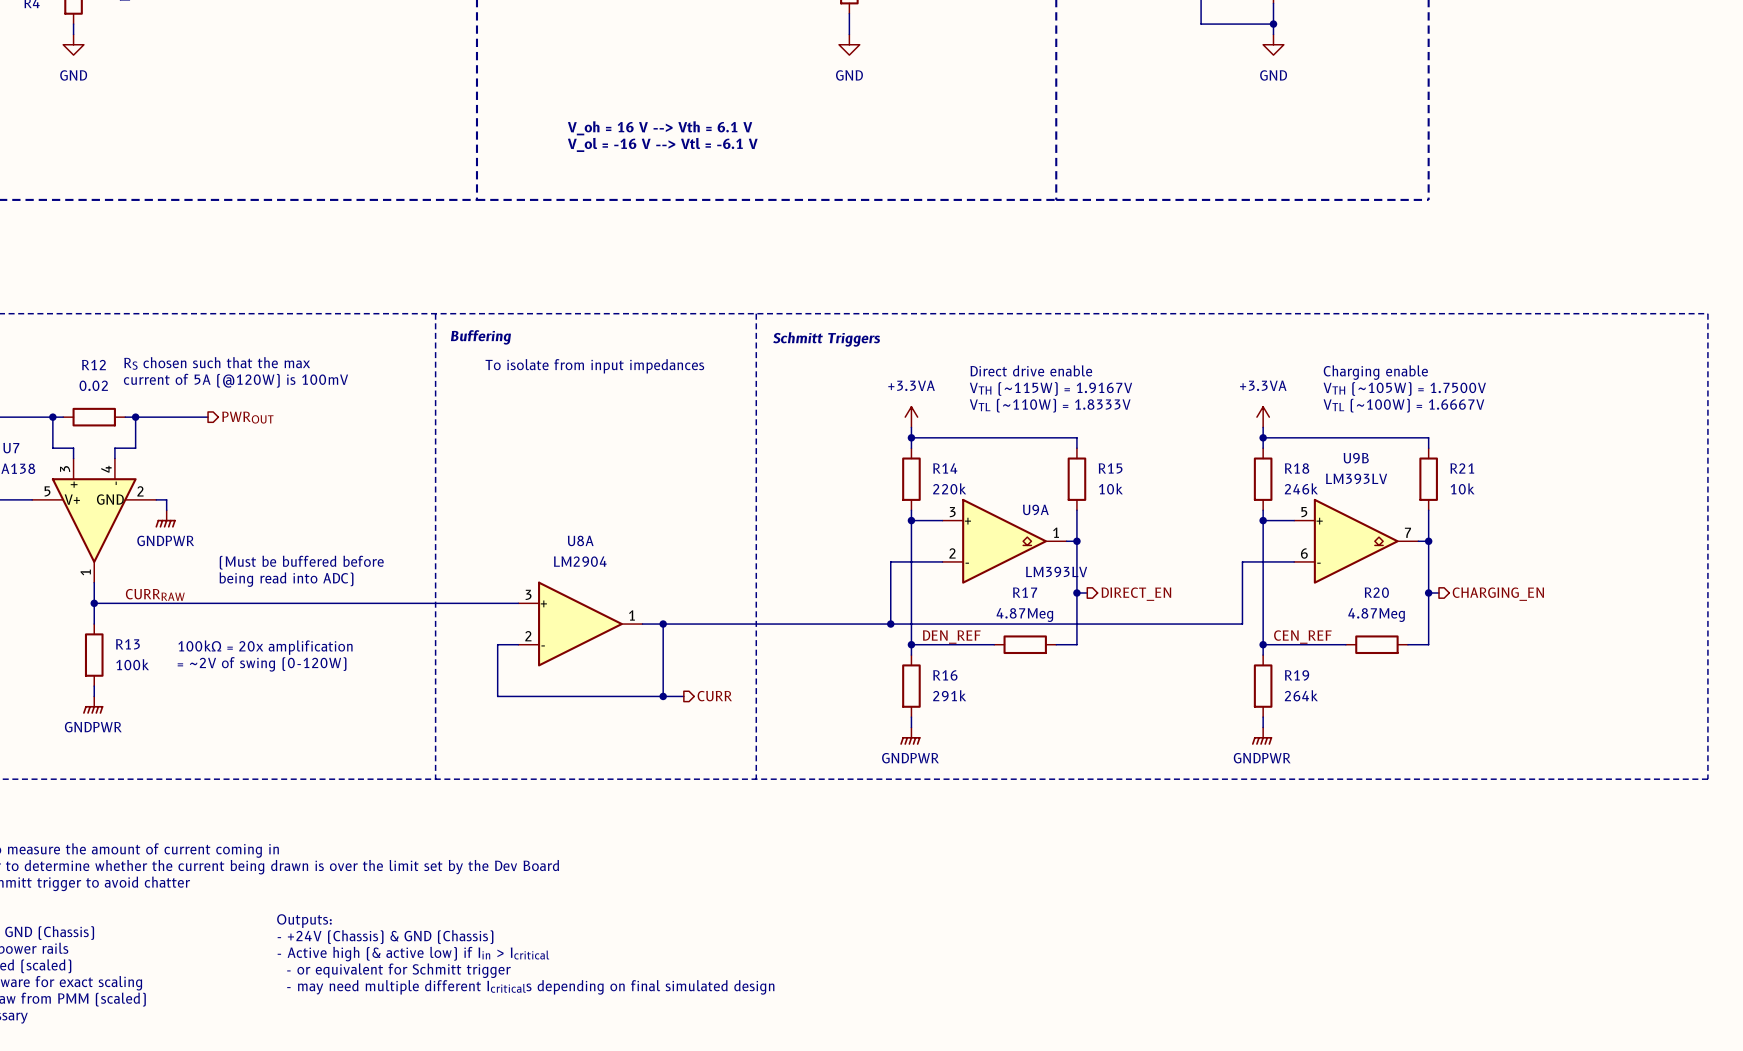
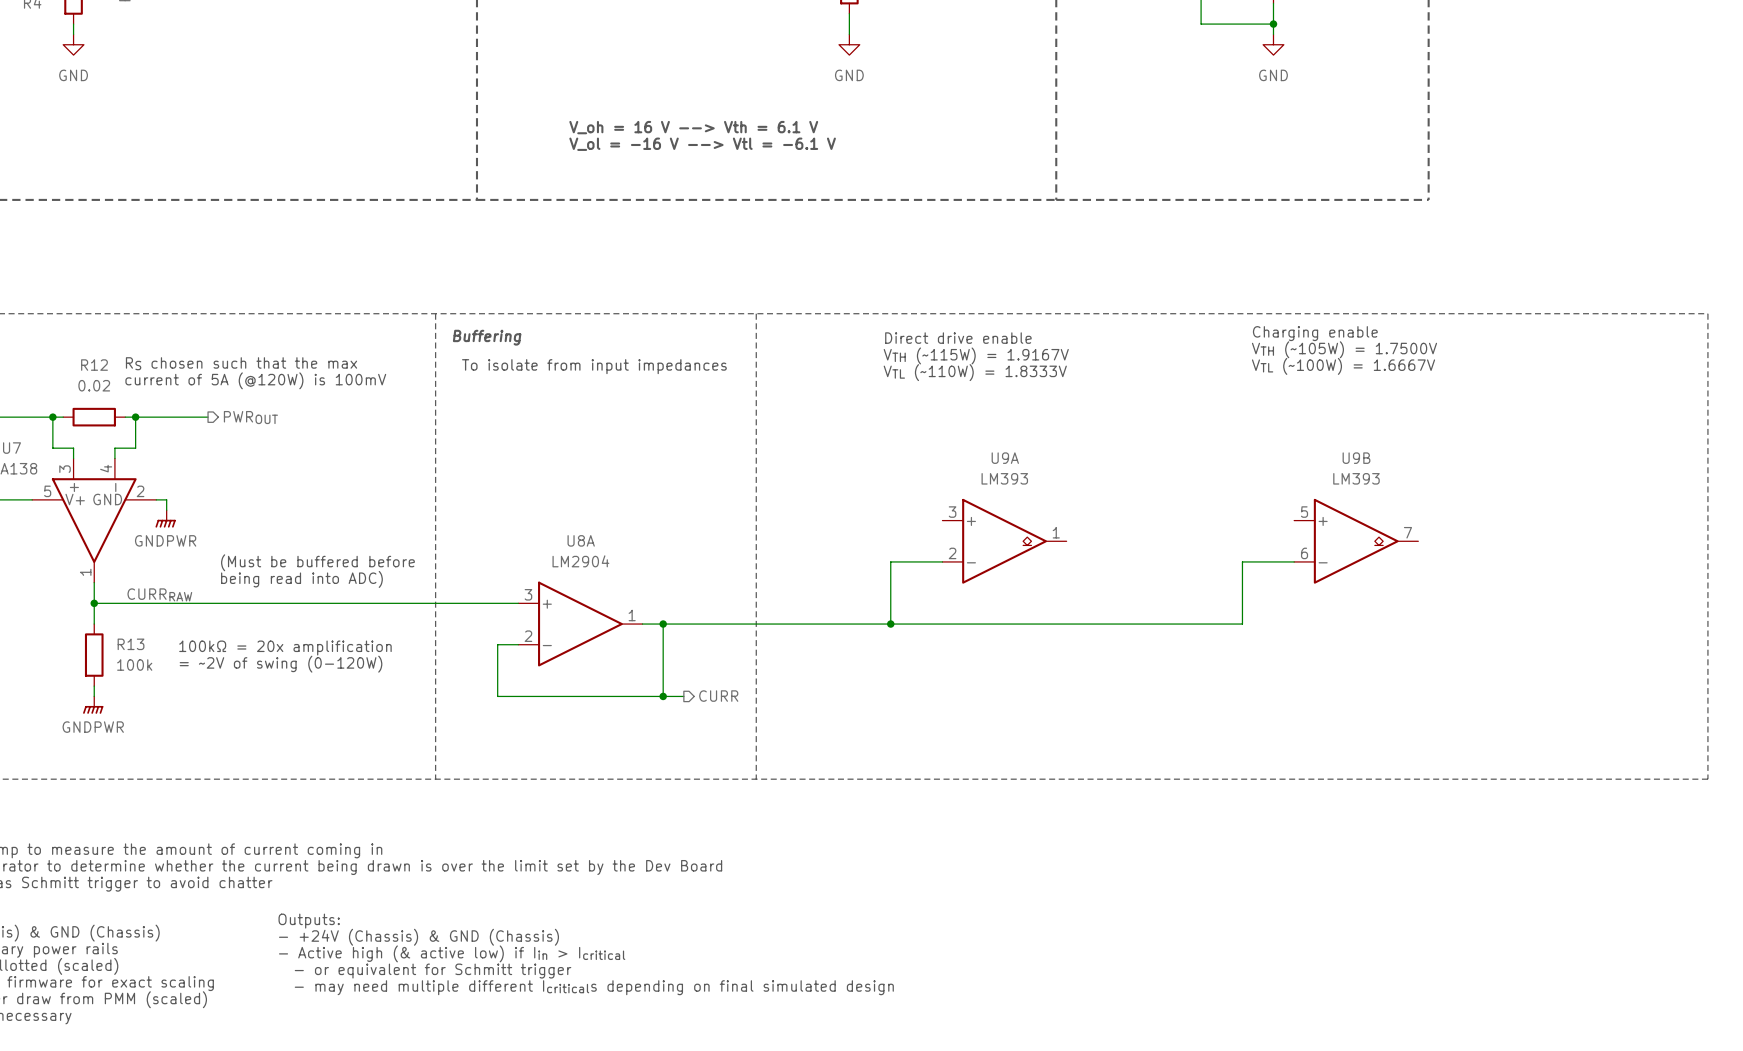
text: Schmitt Triggers (826, 339) -> none
text position: Direct drive enable (1031, 370) -> Direct drive enable (958, 338)
text position: Charging enable (1375, 372) -> Charging enable (1315, 333)
text position: VTH (~115W) = 1.9167V (1050, 388) -> VTH (~115W) = 1.9167V (976, 355)
text position: VTH (~105W) = 1.7500V (1404, 388) -> VTH (~105W) = 1.7500V (1344, 349)
text position: VTL (~110W) = 1.8333V (1050, 405) -> VTL (~110W) = 1.8333V (975, 372)
text position: VTL (~100W) = 1.6667V (1403, 405) -> VTL (~100W) = 1.6667V (1343, 366)
power symbol: +3.3VA (911, 417) -> none
power symbol: +3.3VA (1263, 417) -> none
wire: (911, 427) (911, 448) -> none
wire: (1263, 427) (1263, 448) -> none
wire: (911, 437) (1076, 437) (1076, 448) -> none
junction: (911, 437) -> none
wire: (1263, 437) (1428, 437) (1428, 448) -> none
junction: (1263, 437) -> none
U9B value: LM393LV (1356, 478) -> LM393 (1356, 478)
R14: 220k (911, 479) -> none
R15: 10k (1076, 479) -> none
R18: 246k (1263, 479) -> none
R21: 10k (1428, 479) -> none
U9A name position: U9A (1035, 509) -> U9A (1005, 458)
wire: (911, 510) (911, 655) -> none
wire: (1076, 510) (1076, 644) (1056, 644) -> none
wire: (1263, 510) (1263, 655) -> none
wire: (1428, 510) (1428, 644) (1407, 644) -> none
wire: (911, 520) (942, 520) -> none
junction: (911, 520) -> none
wire: (1263, 520) (1294, 520) -> none
junction: (1263, 520) -> none
wire: (1066, 541) (1076, 541) -> none
junction: (1076, 541) -> none
wire: (1418, 541) (1428, 541) -> none
junction: (1428, 541) -> none
U9A value: LM393LV (1056, 571) -> LM393 (1004, 478)
wire: (1076, 593) (1087, 593) -> none
junction: (1076, 593) -> none
wire: (1428, 593) (1438, 593) -> none
junction: (1428, 593) -> none
hierarchical label: DIRECT_EN (1136, 594) -> none
hierarchical label: CHARGING_EN (1498, 594) -> none
label: DEN_REF (951, 637) -> none
label: CEN_REF (1302, 637) -> none
wire: (911, 644) (994, 644) -> none
junction: (911, 644) -> none
R17: 4.87Meg (1025, 644) -> none
wire: (1263, 644) (1345, 644) -> none
junction: (1263, 644) -> none
R20: 4.87Meg (1376, 644) -> none
R16: 291k (911, 686) -> none
R19: 264k (1263, 686) -> none
wire: (911, 717) (911, 727) -> none
wire: (1263, 717) (1263, 727) -> none
power symbol: GNDPWR (910, 736) -> none
power symbol: GNDPWR (1262, 736) -> none

